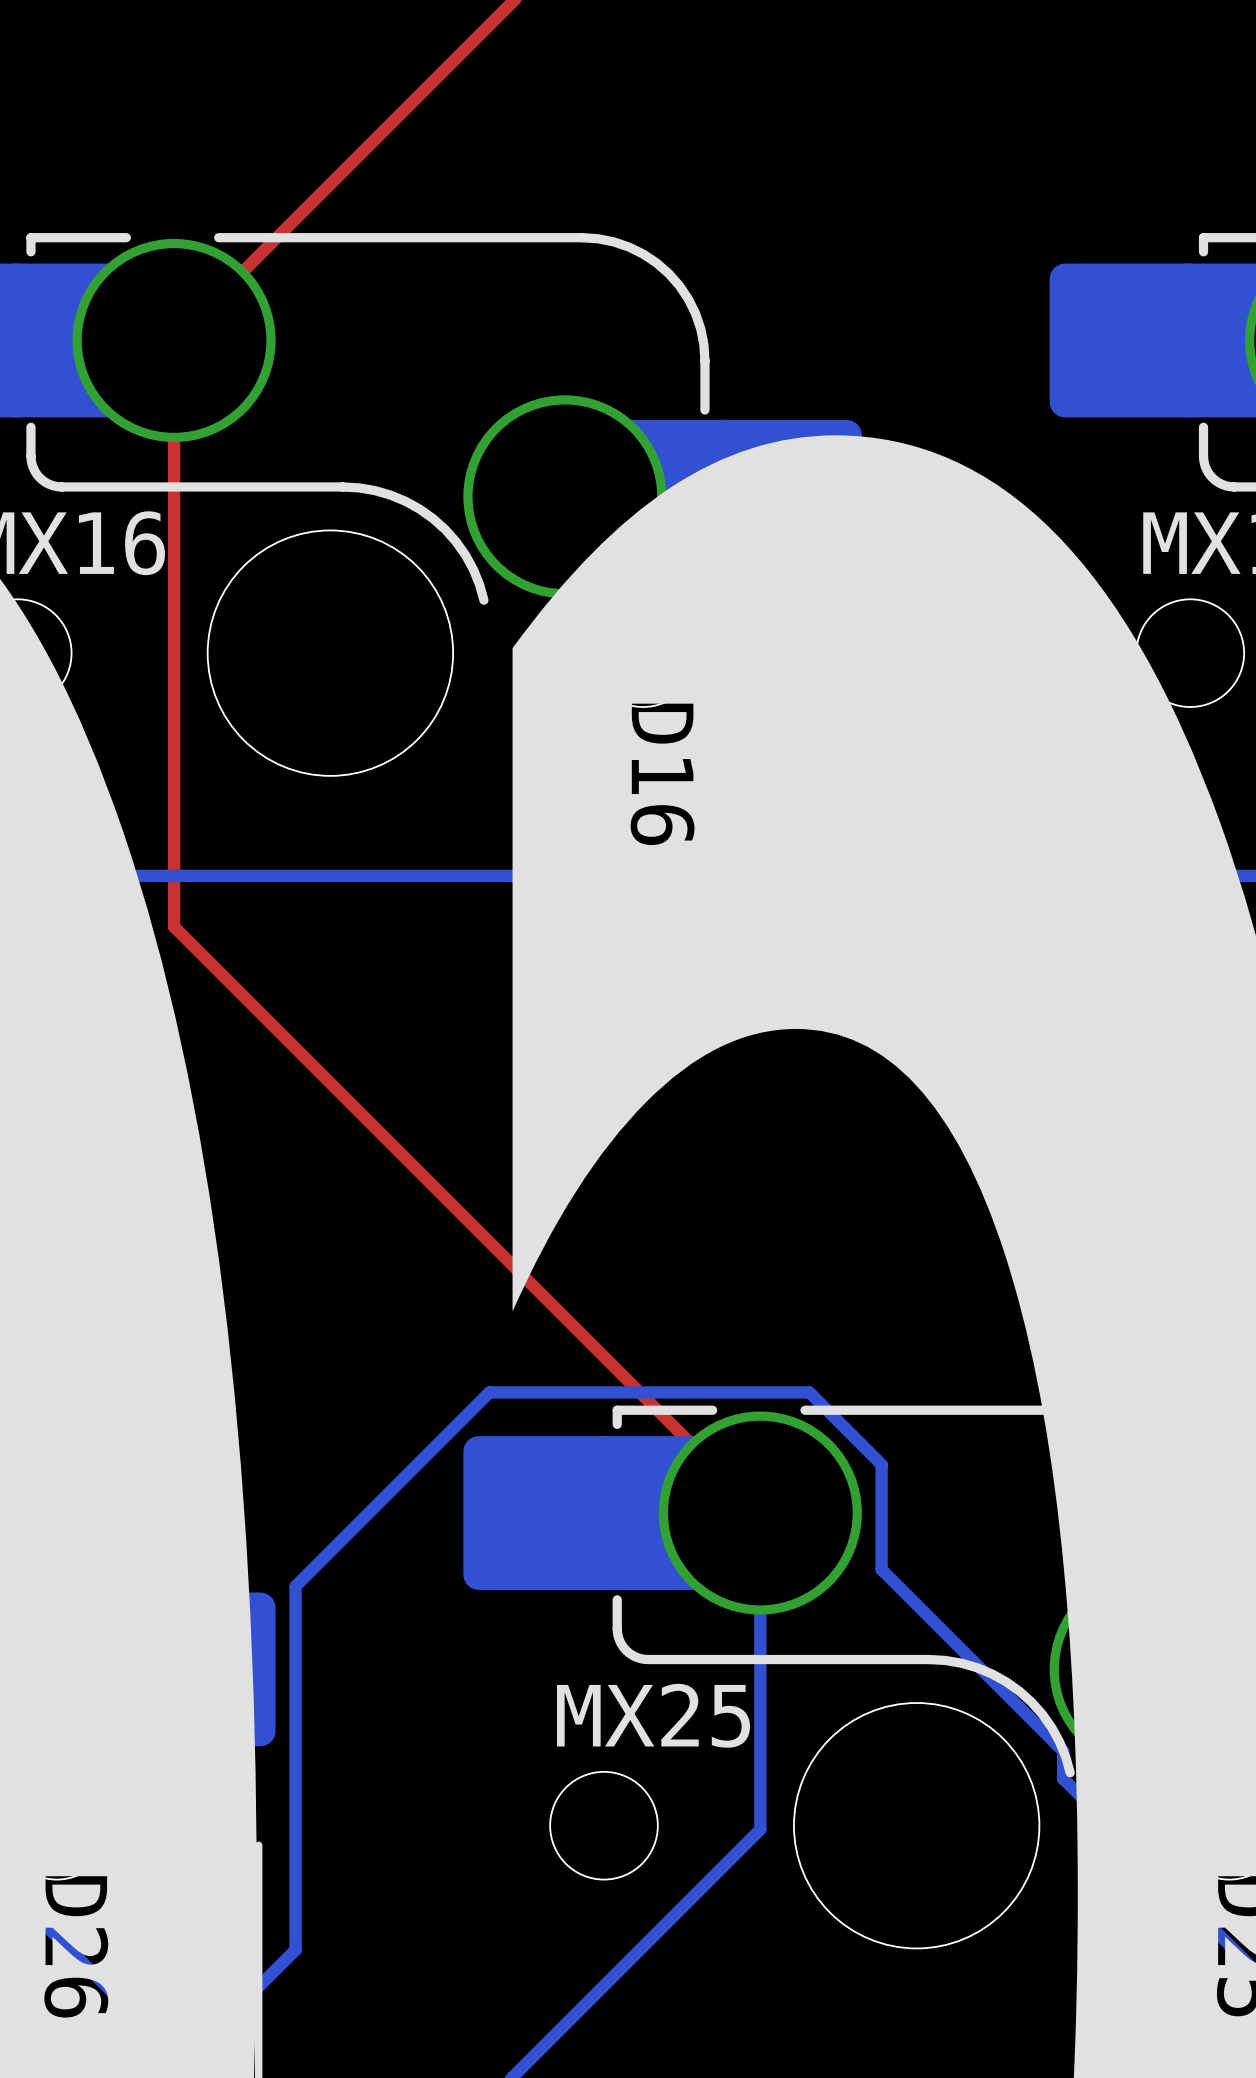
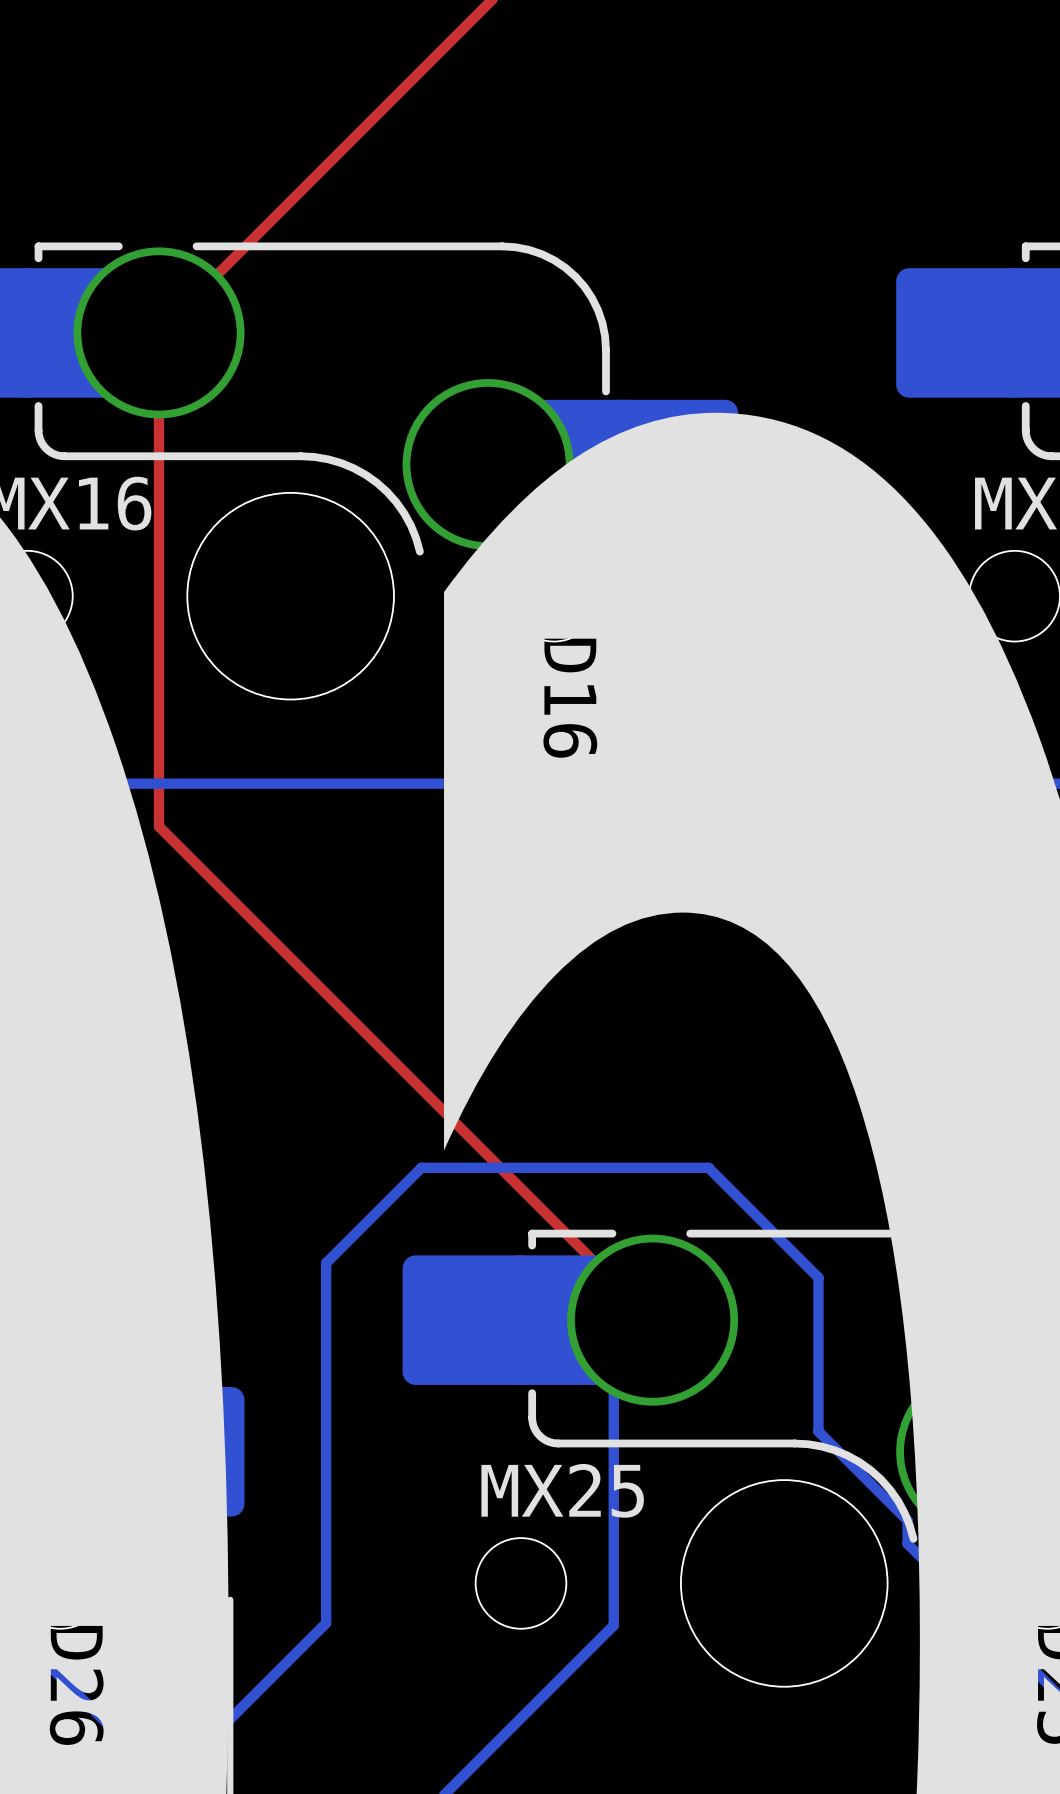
bottom track: (760, 1513) (760, 1829) (714, 1875) -> (652, 1320) (613, 1359) (613, 1625)
bottom track: (957, 1645) (881, 1569) (881, 1464) (809, 1392) (489, 1392) (295, 1586) (295, 1949) -> (818, 1431) (818, 1277) (708, 1167) (421, 1167) (326, 1263) (326, 1623) (261, 1687)

